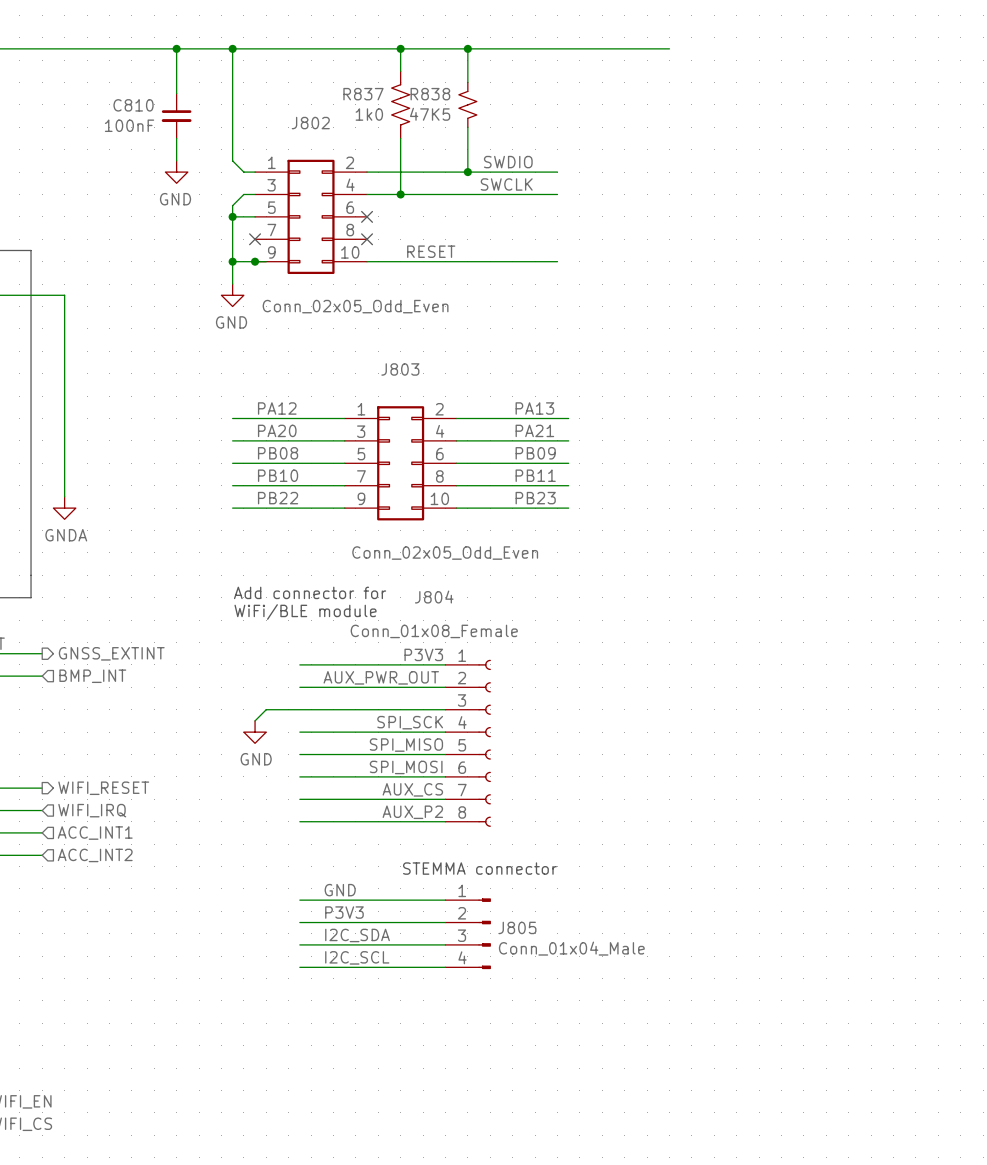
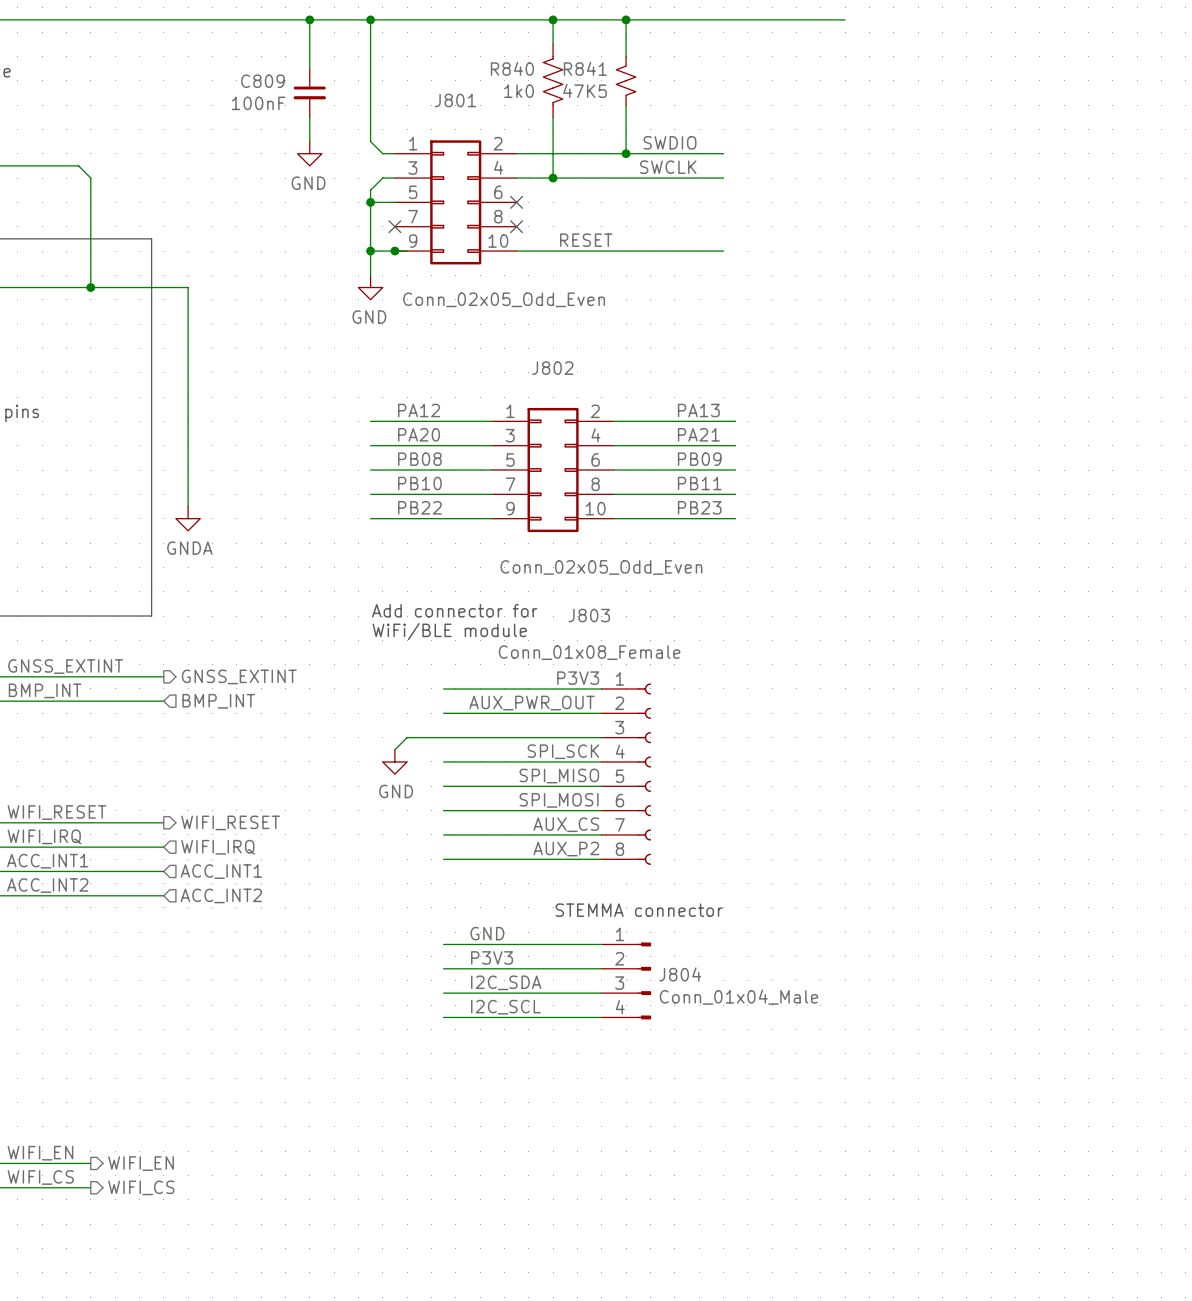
R837 name: R837 (363, 94) -> R840 (512, 68)
R838 name: R838 (430, 94) -> R841 (585, 68)
C810 name: C810 (133, 105) -> C809 (262, 81)
J802 name: J802 (310, 123) -> J801 (455, 100)
J803 name: J803 (400, 369) -> J802 (552, 368)
J804 name: J804 (434, 597) -> J803 (589, 615)
J805 name: J805 (517, 927) -> J804 (680, 974)

